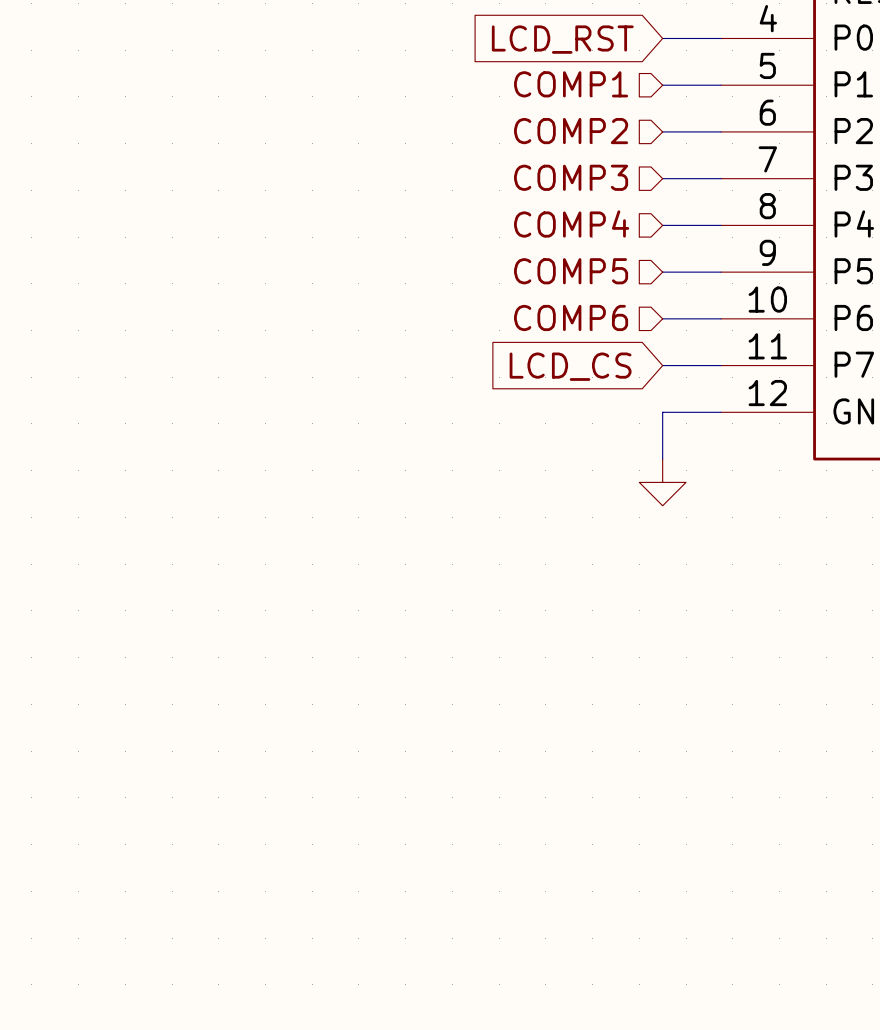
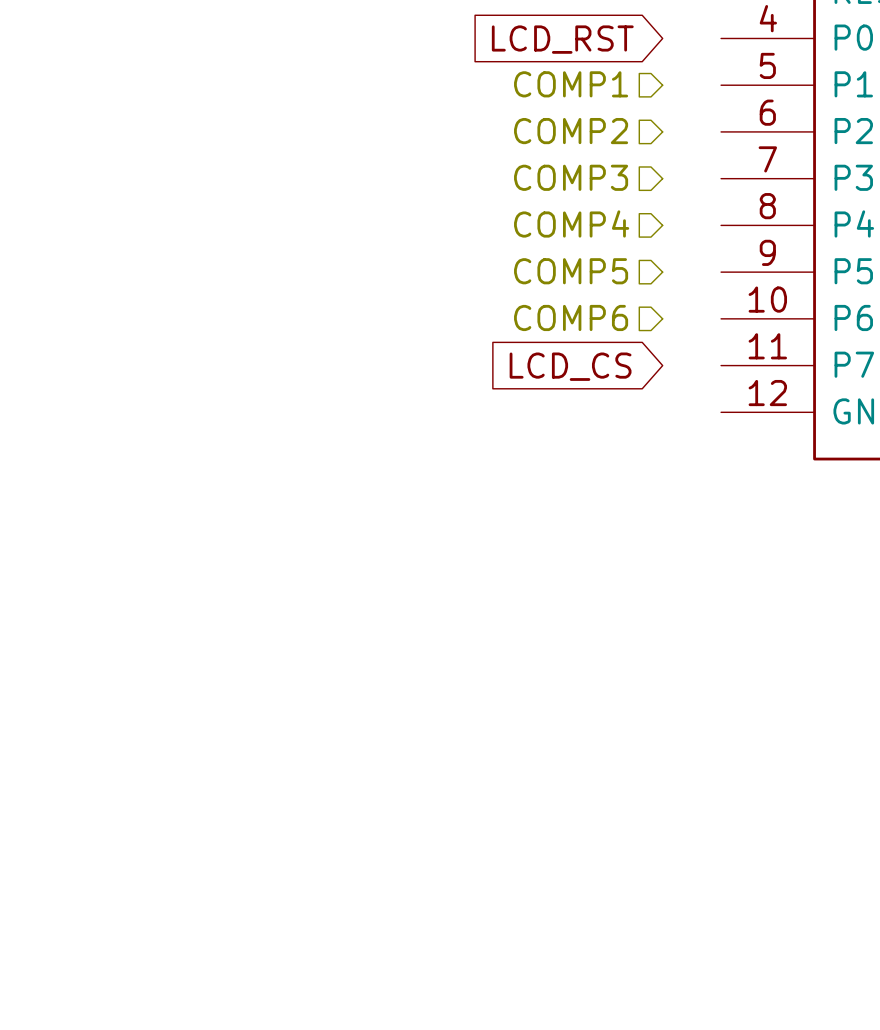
wire: (662, 38) (721, 38) -> none
wire: (662, 85) (721, 85) -> none
wire: (662, 131) (721, 131) -> none
wire: (662, 178) (721, 178) -> none
wire: (662, 225) (721, 225) -> none
wire: (662, 272) (721, 272) -> none
wire: (662, 318) (721, 318) -> none
wire: (662, 365) (721, 365) -> none
wire: (721, 412) (662, 412) (662, 459) -> none
power symbol: (662, 482) -> none

